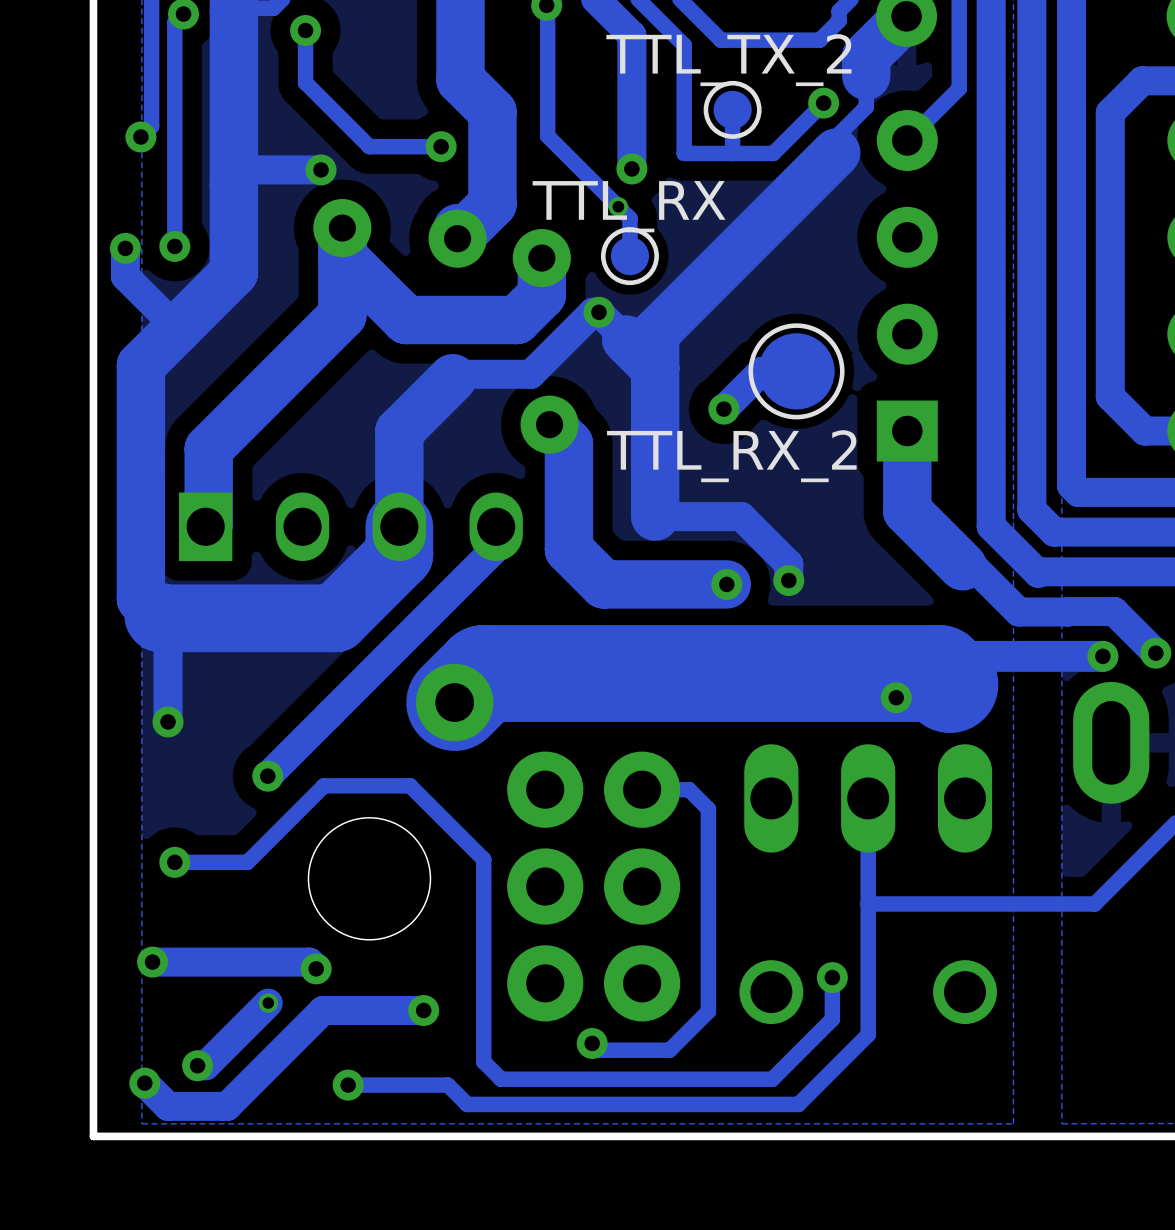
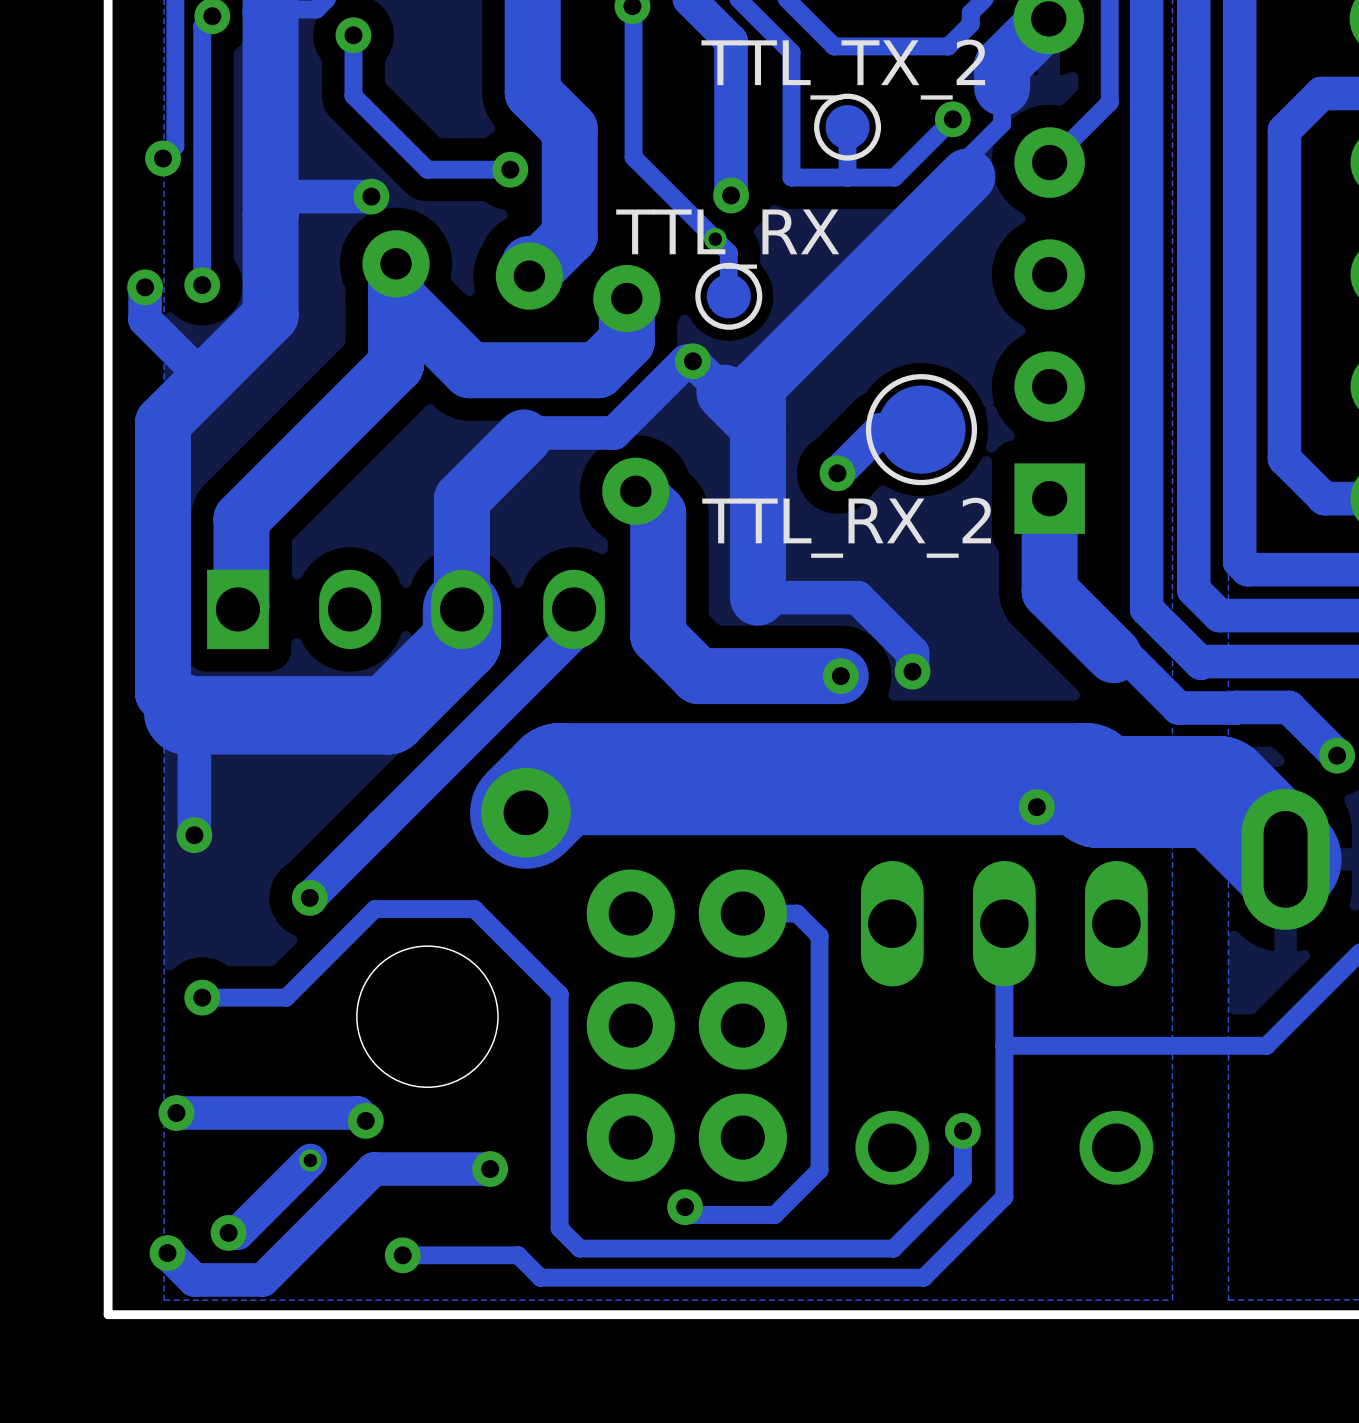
track: (1102, 656) (978, 656) (949, 684) -> (1285, 859) (1218, 792) (1099, 792)
via: (1102, 656) -> none

